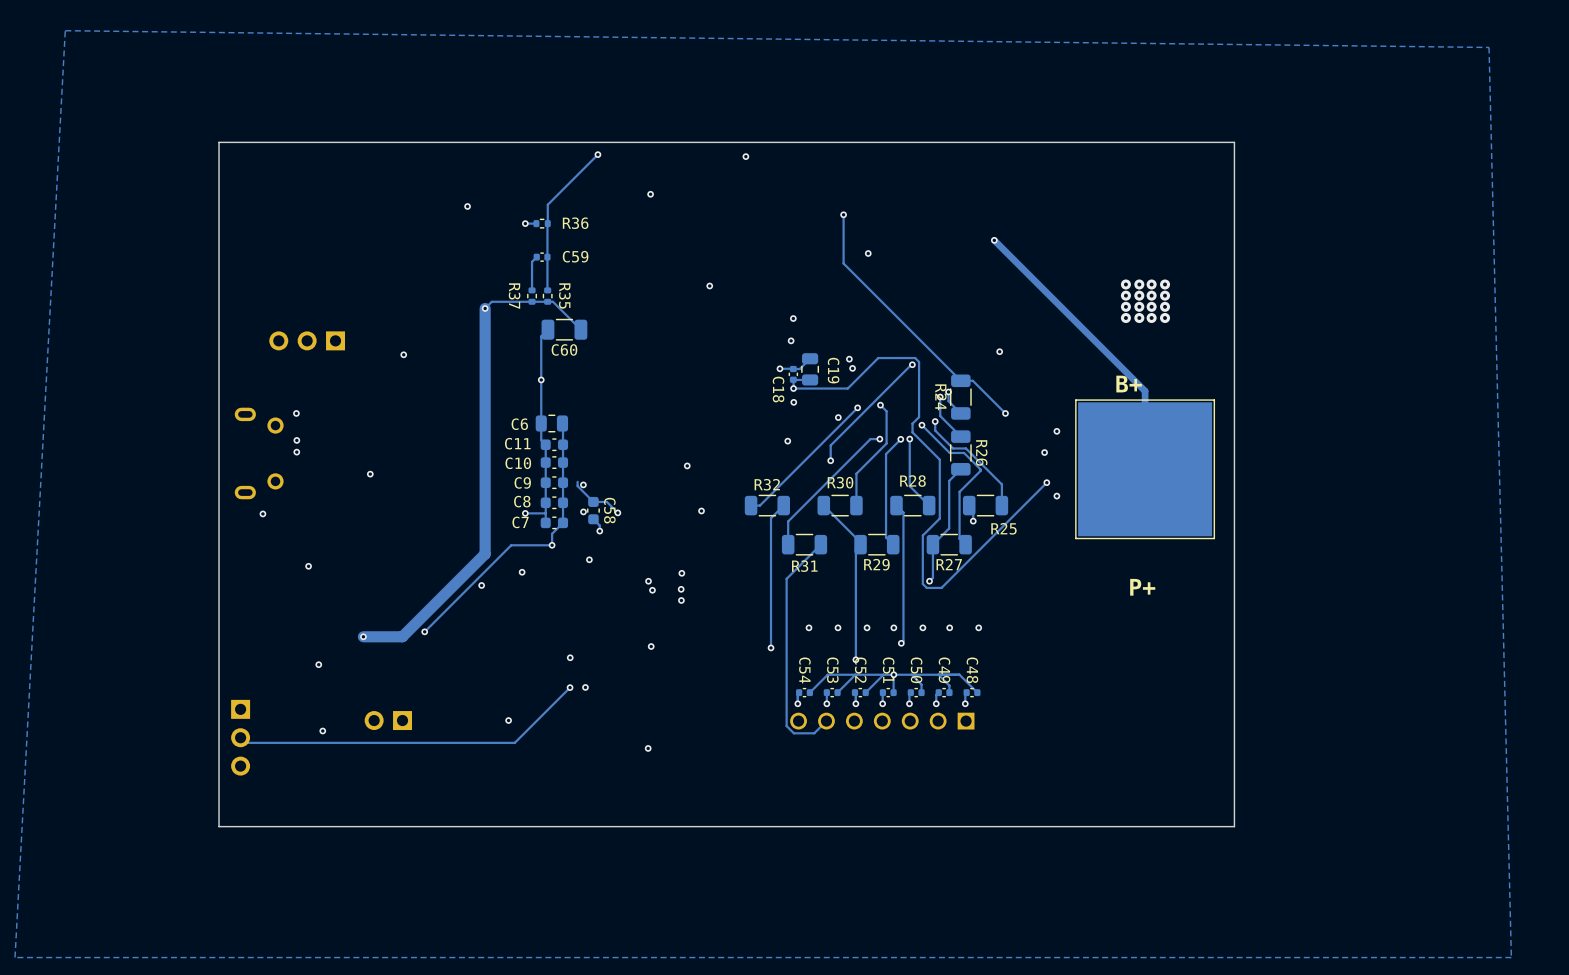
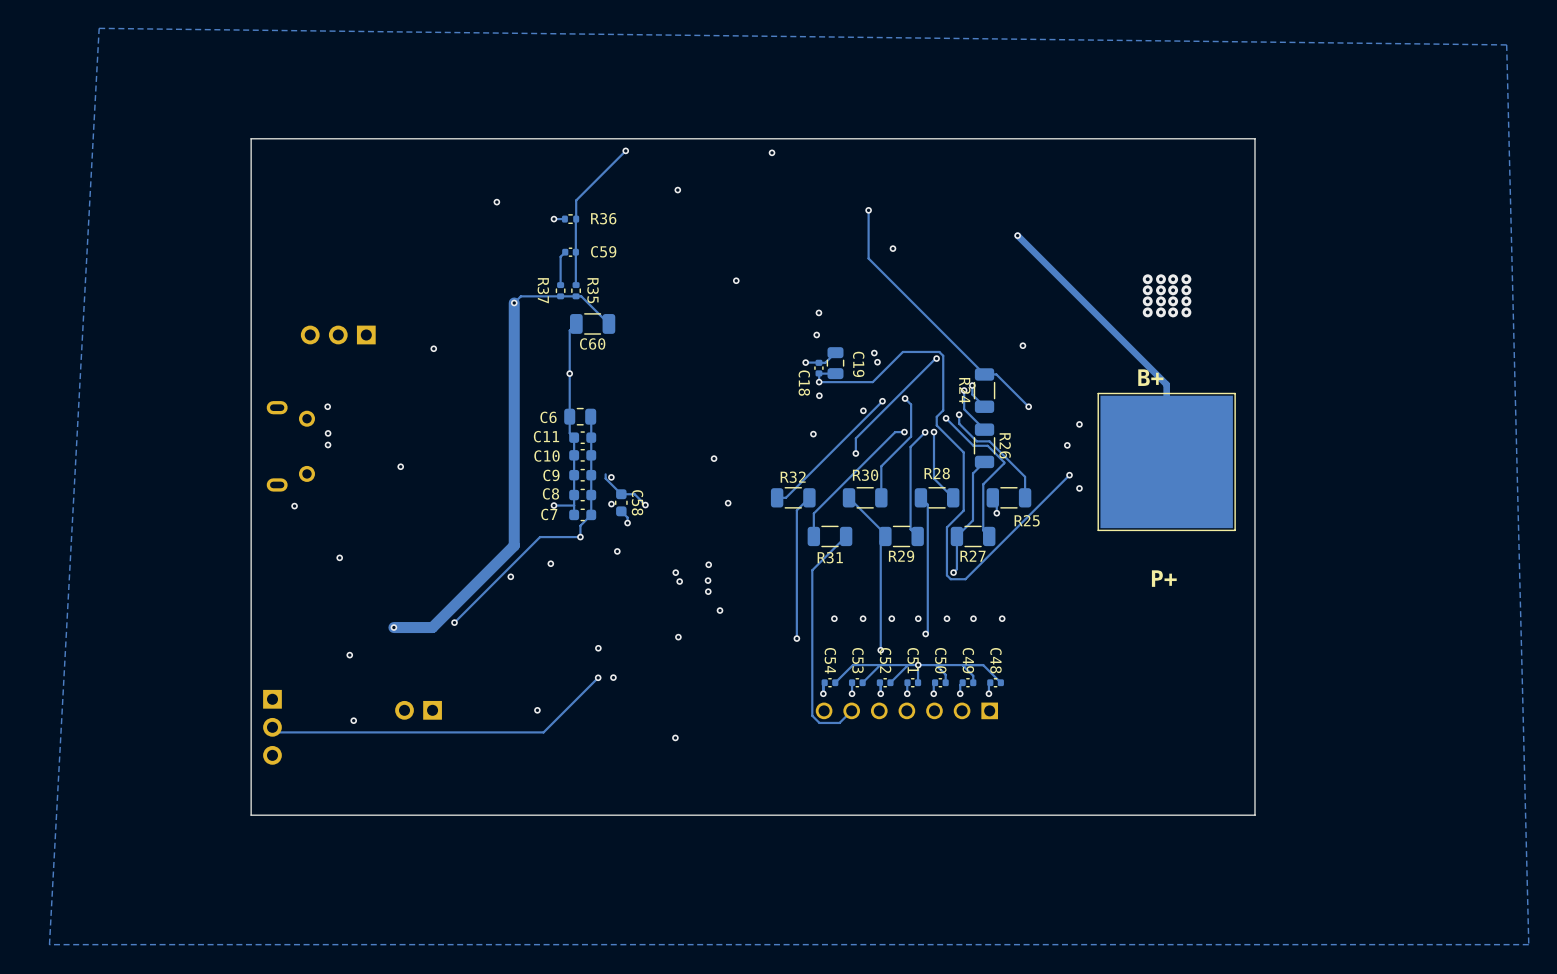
via: none -> (720, 610)

